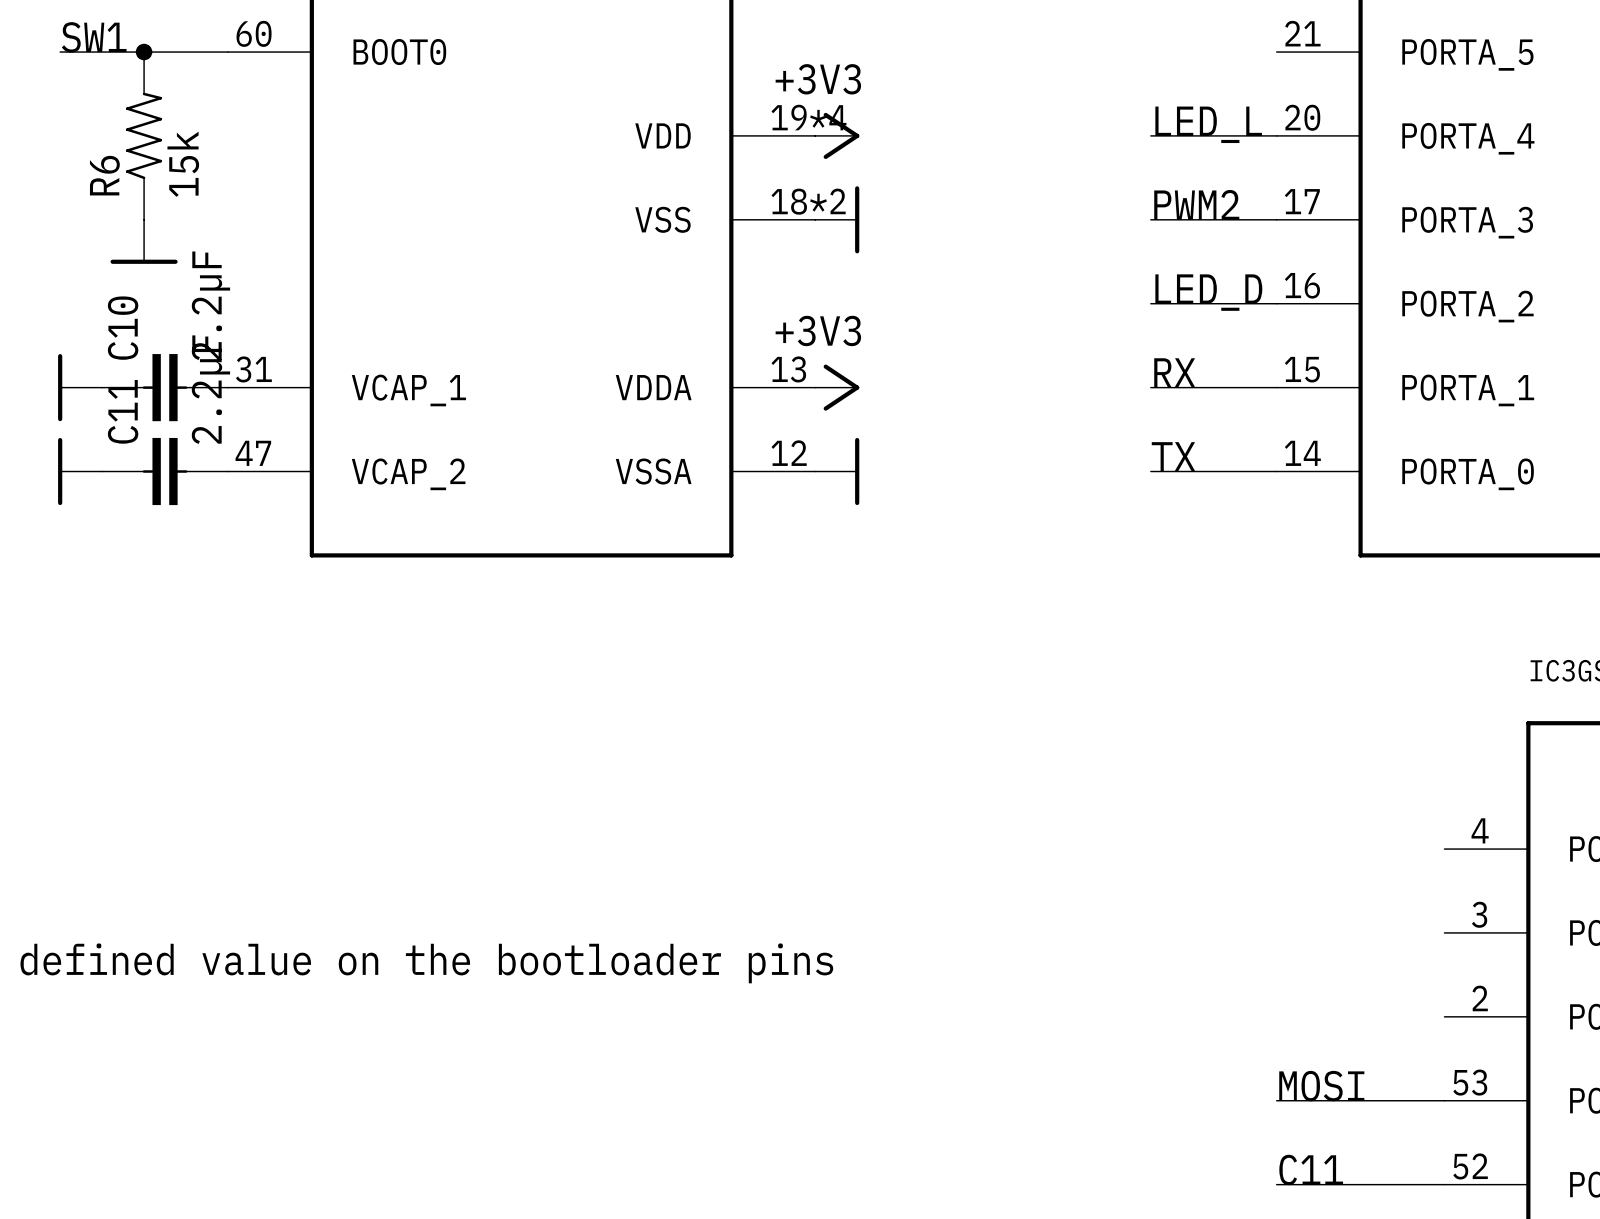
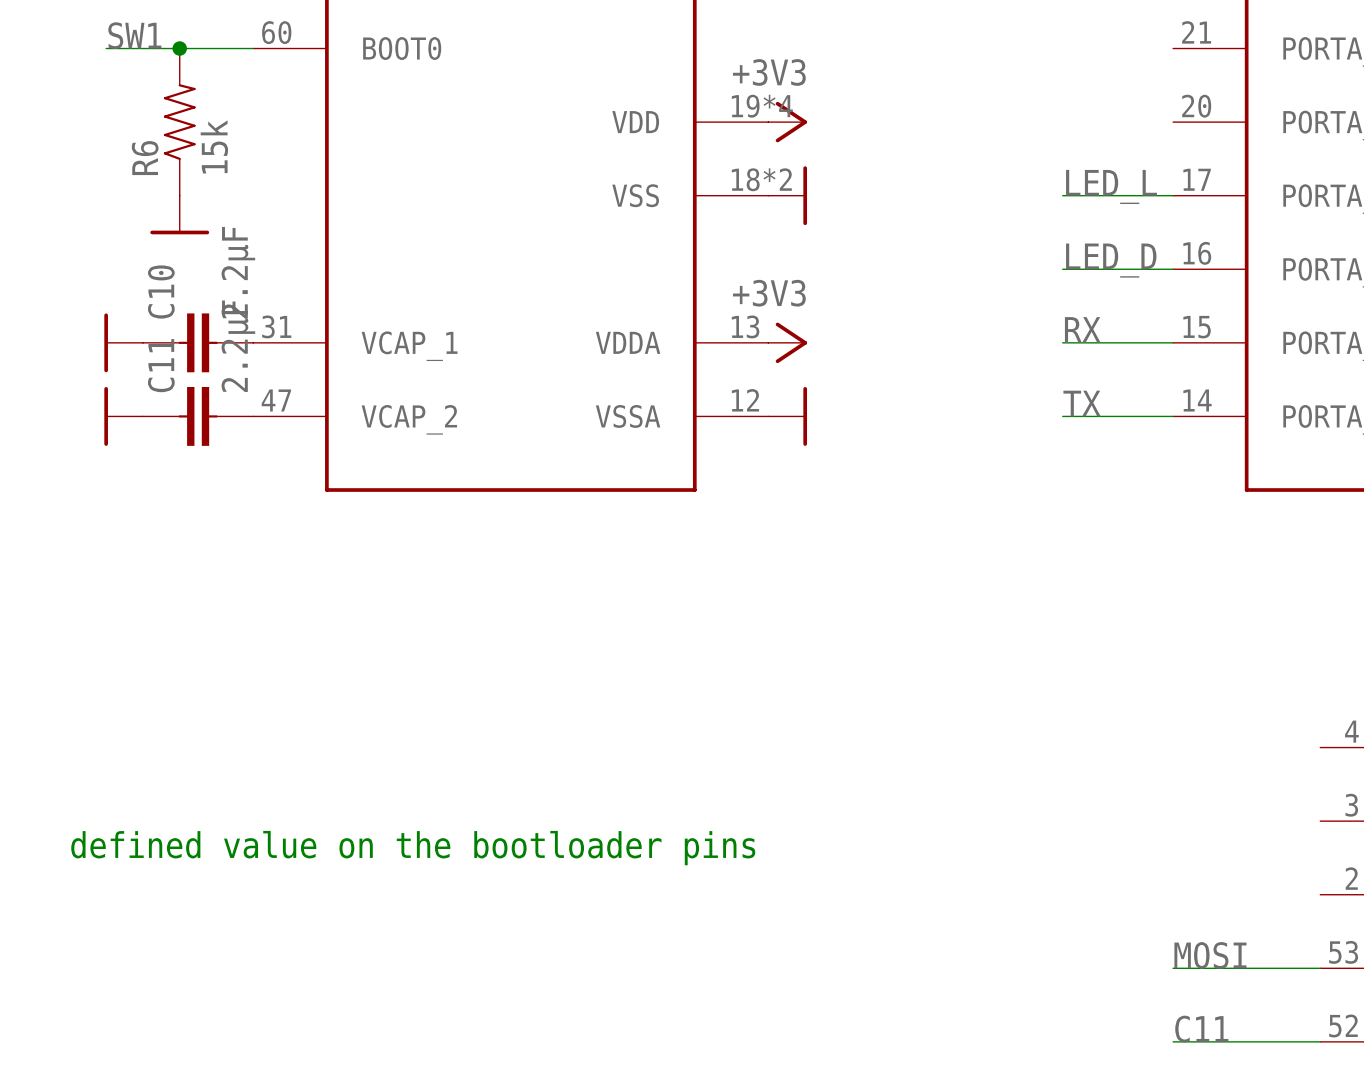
label: LED_L (1208, 124) -> none
wire: (1150, 135) (1276, 135) -> none
label: PWM2 (1196, 204) -> LED_L (1111, 186)

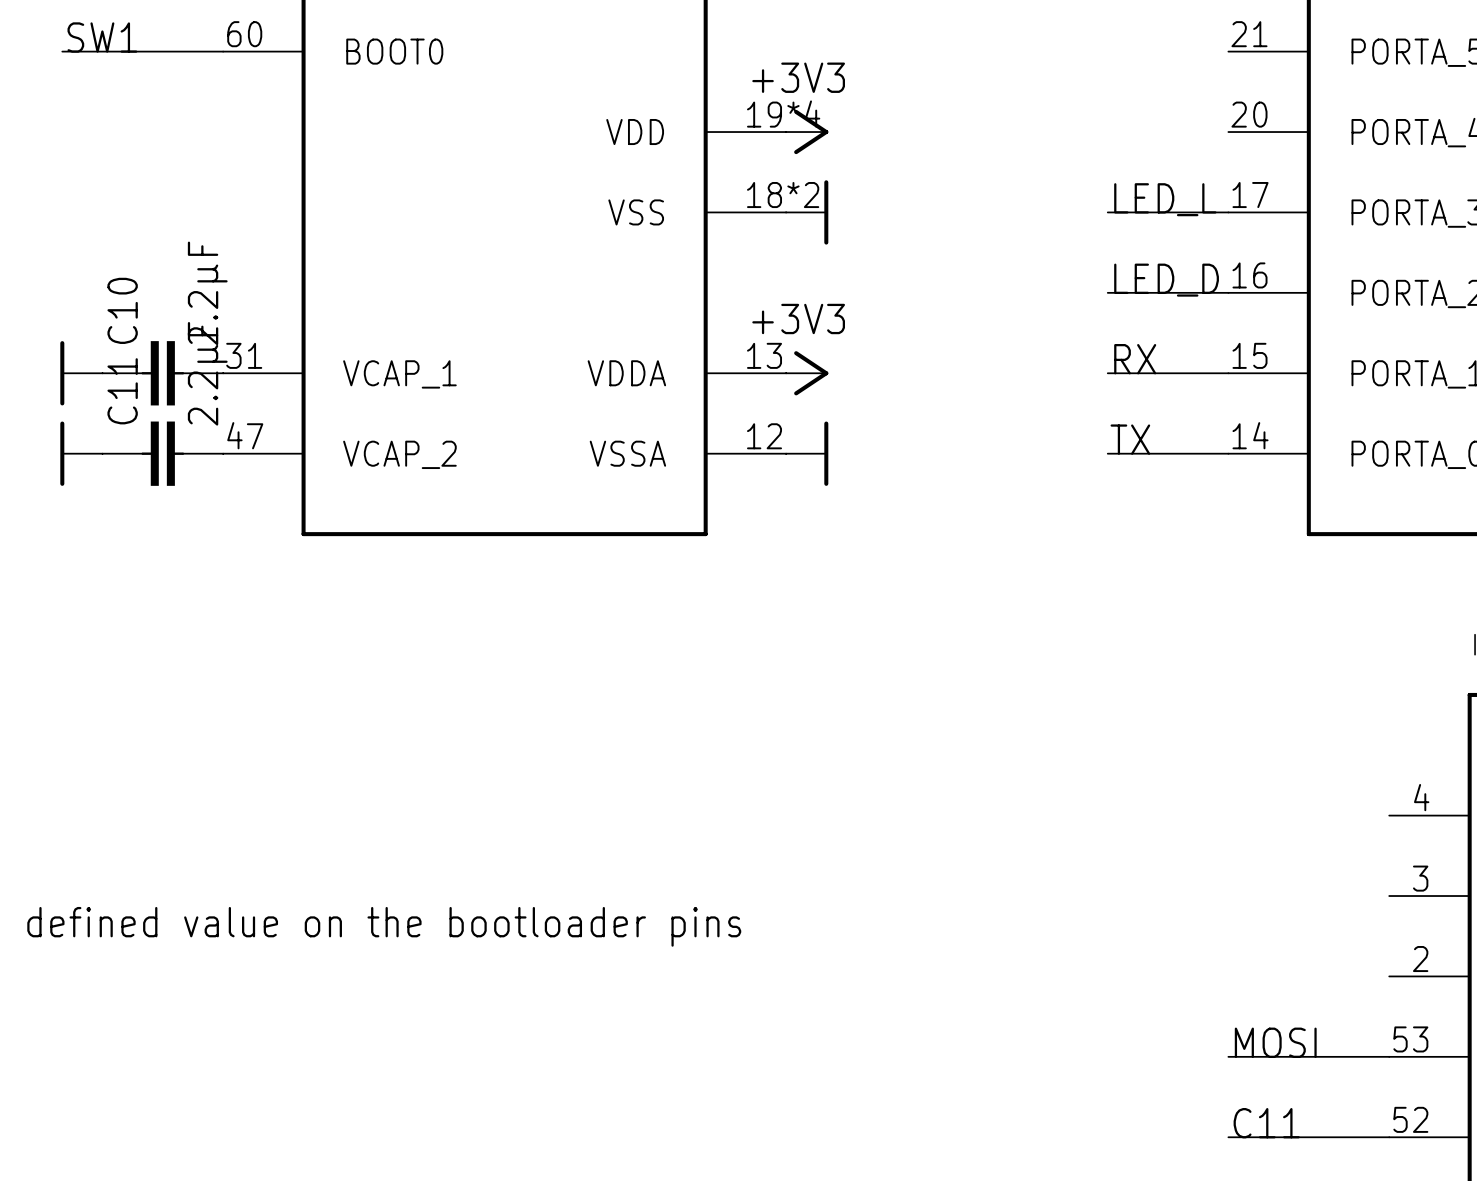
junction: (179, 48) -> none
R6: 15k (179, 122) -> none
power symbol: (179, 215) -> none

